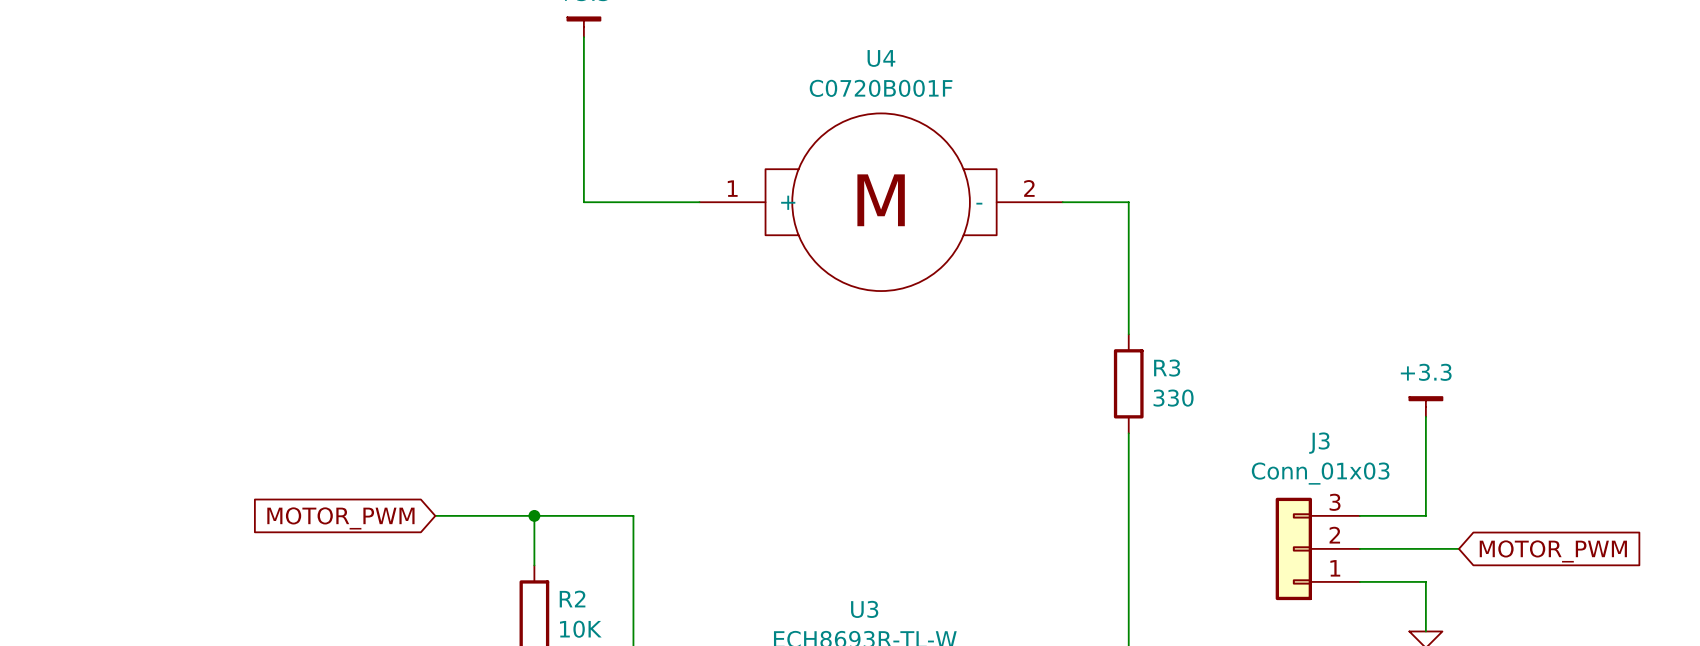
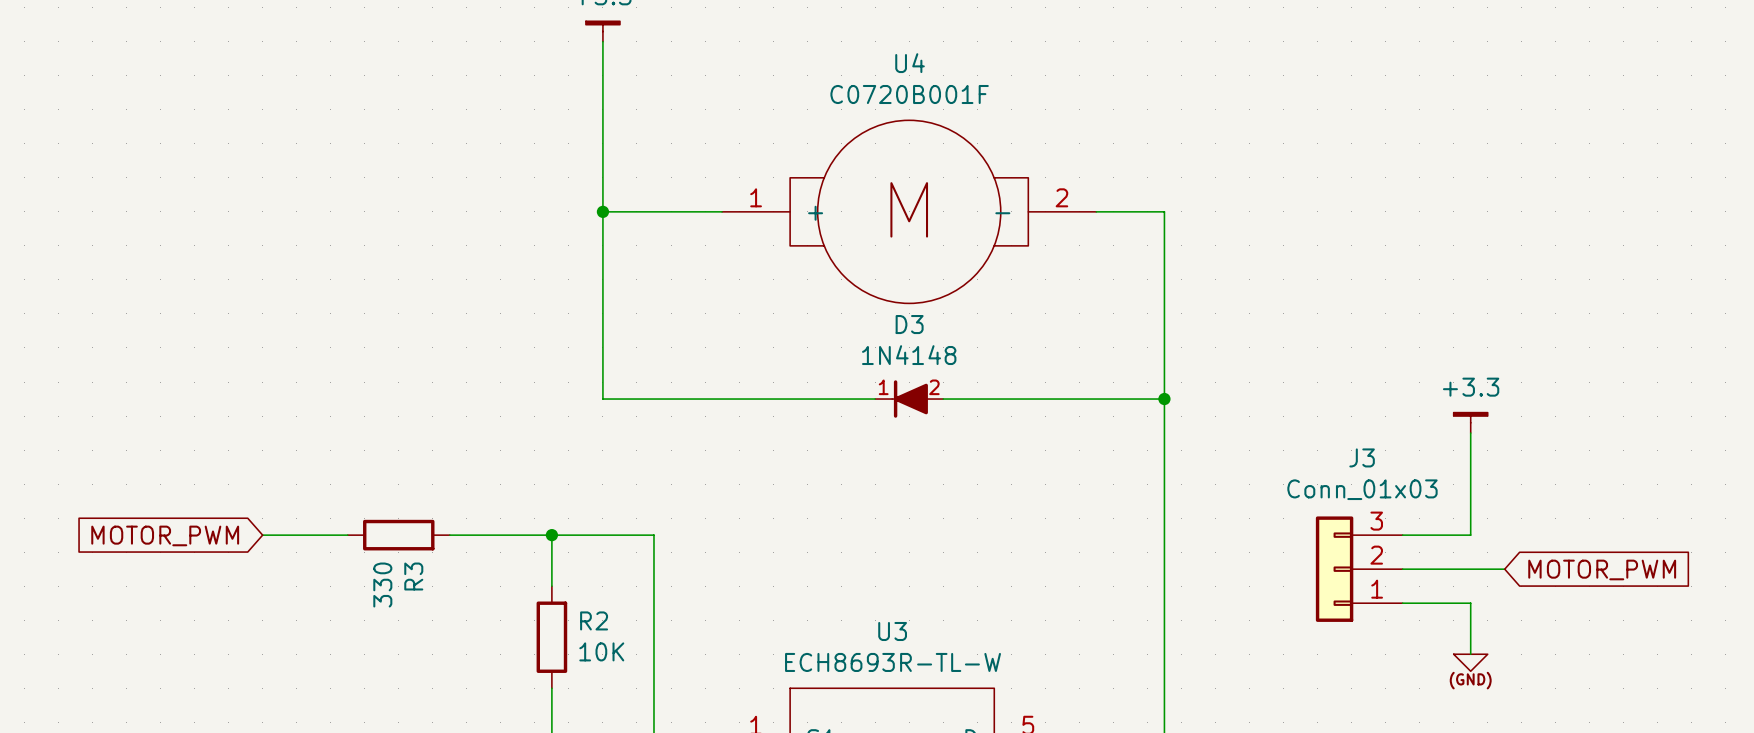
wire: none -> (602, 211) (602, 399) (875, 399)
junction: none -> (602, 211)
wire: none -> (1164, 347) (1164, 450)
D3: none -> 1N4148 (909, 399)
wire: none -> (943, 399) (1164, 399)
R3 rotation: 0° (1128, 383) -> 90° clockwise (398, 535)
R3 position: (1128, 383) -> (398, 535)
junction: none -> (1164, 399)
wire: none -> (262, 535) (347, 535)
global label position: MOTOR_PWM (340, 518) -> MOTOR_PWM (165, 535)

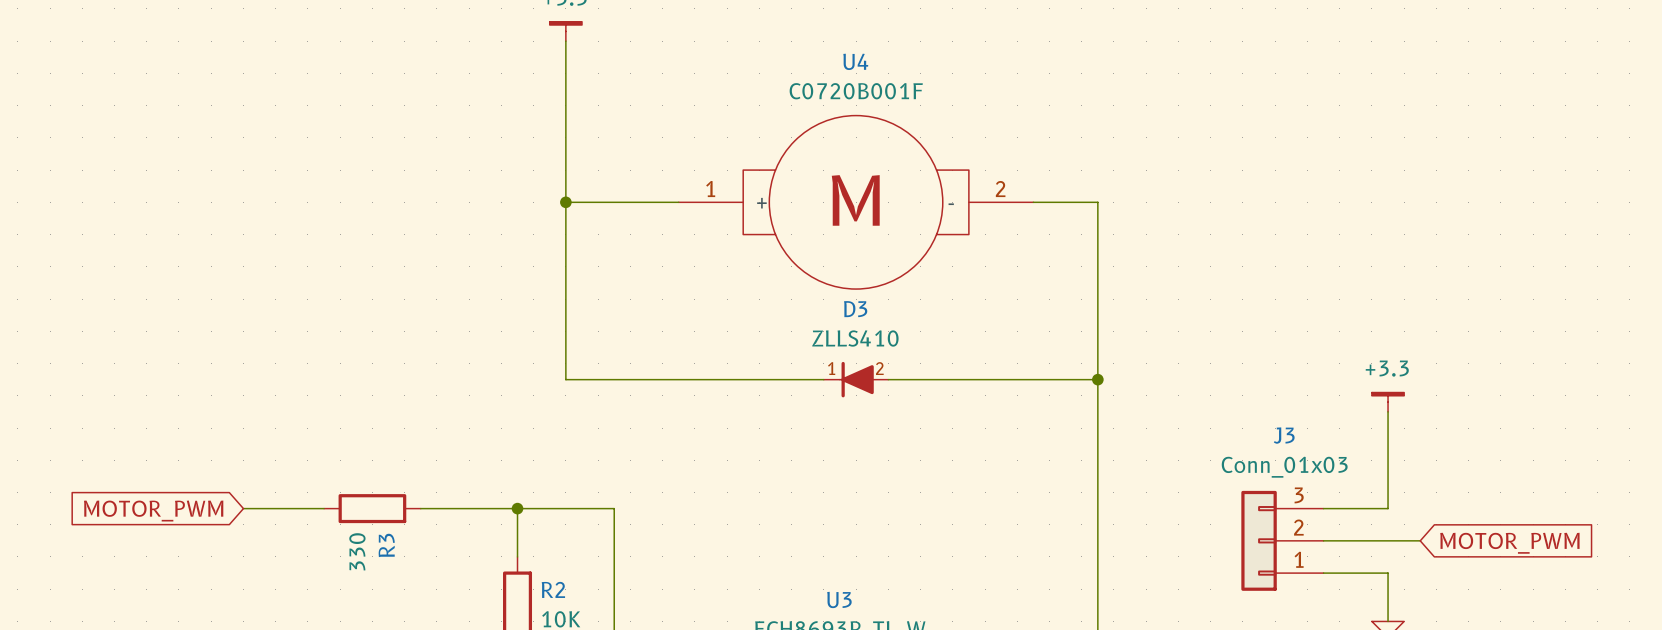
D3 value: 1N4148 (909, 355) -> ZLLS410 (855, 338)

